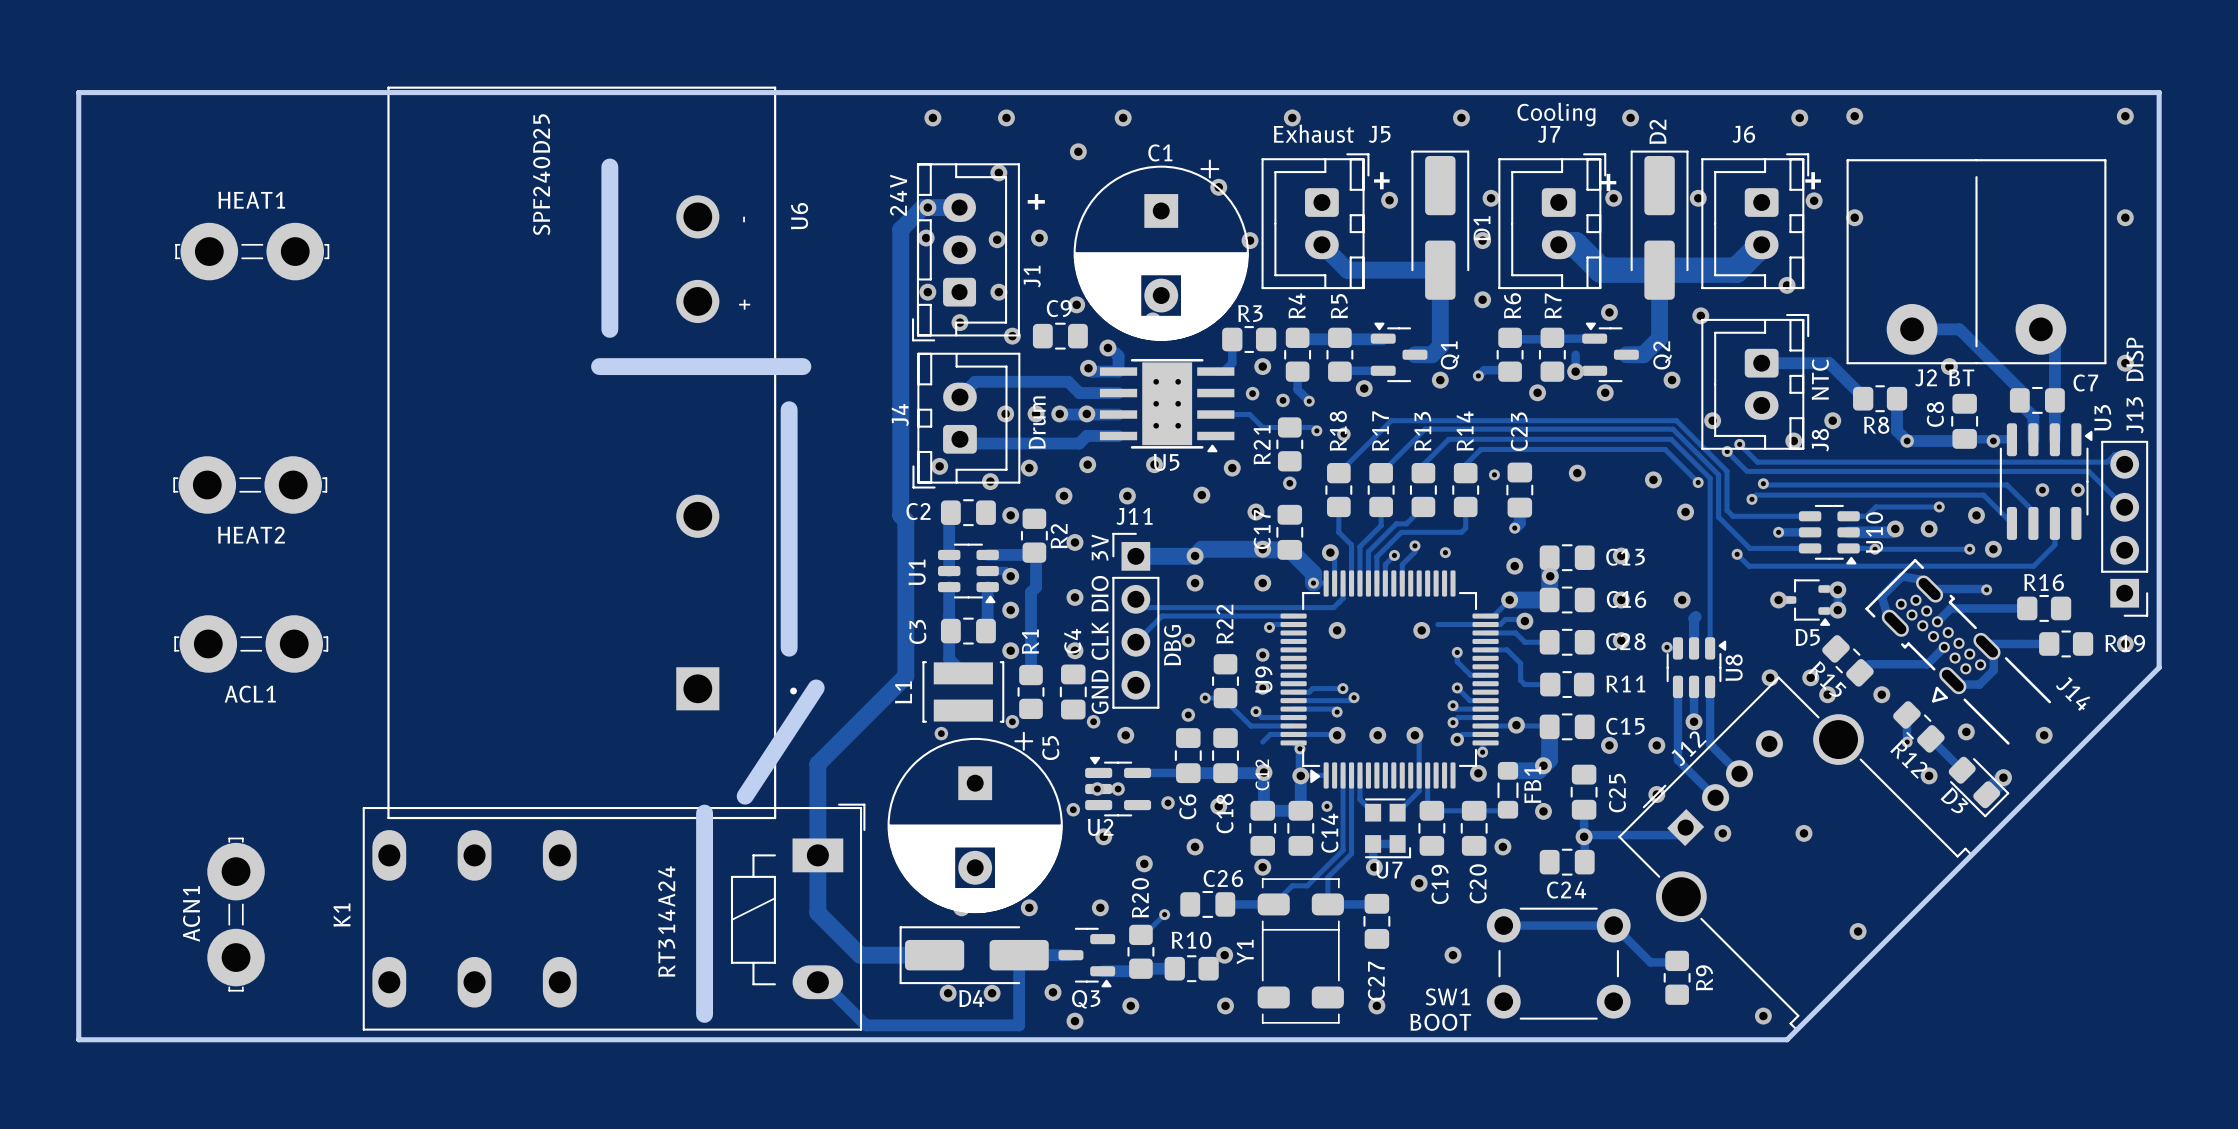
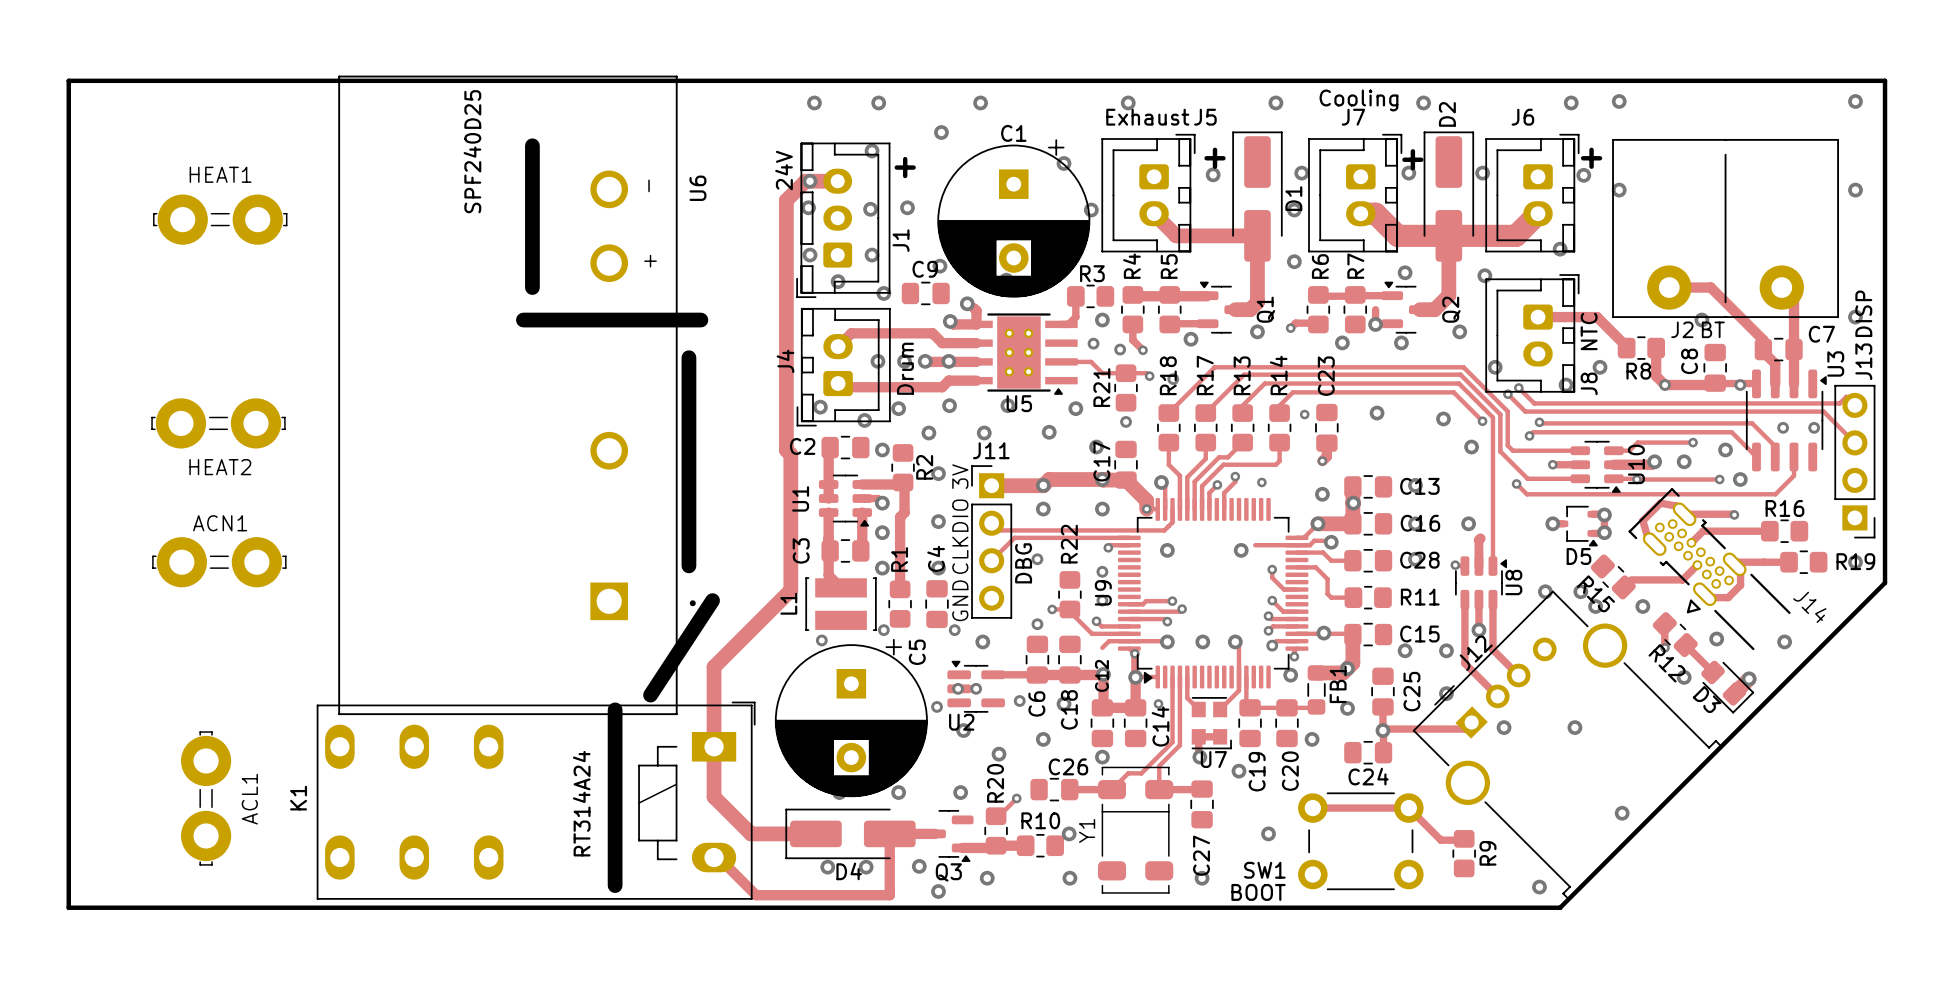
ACL1 name: ACL1 (250, 694) -> ACN1 (220, 523)
ACN1 name: ACN1 (191, 913) -> ACL1 (249, 799)

